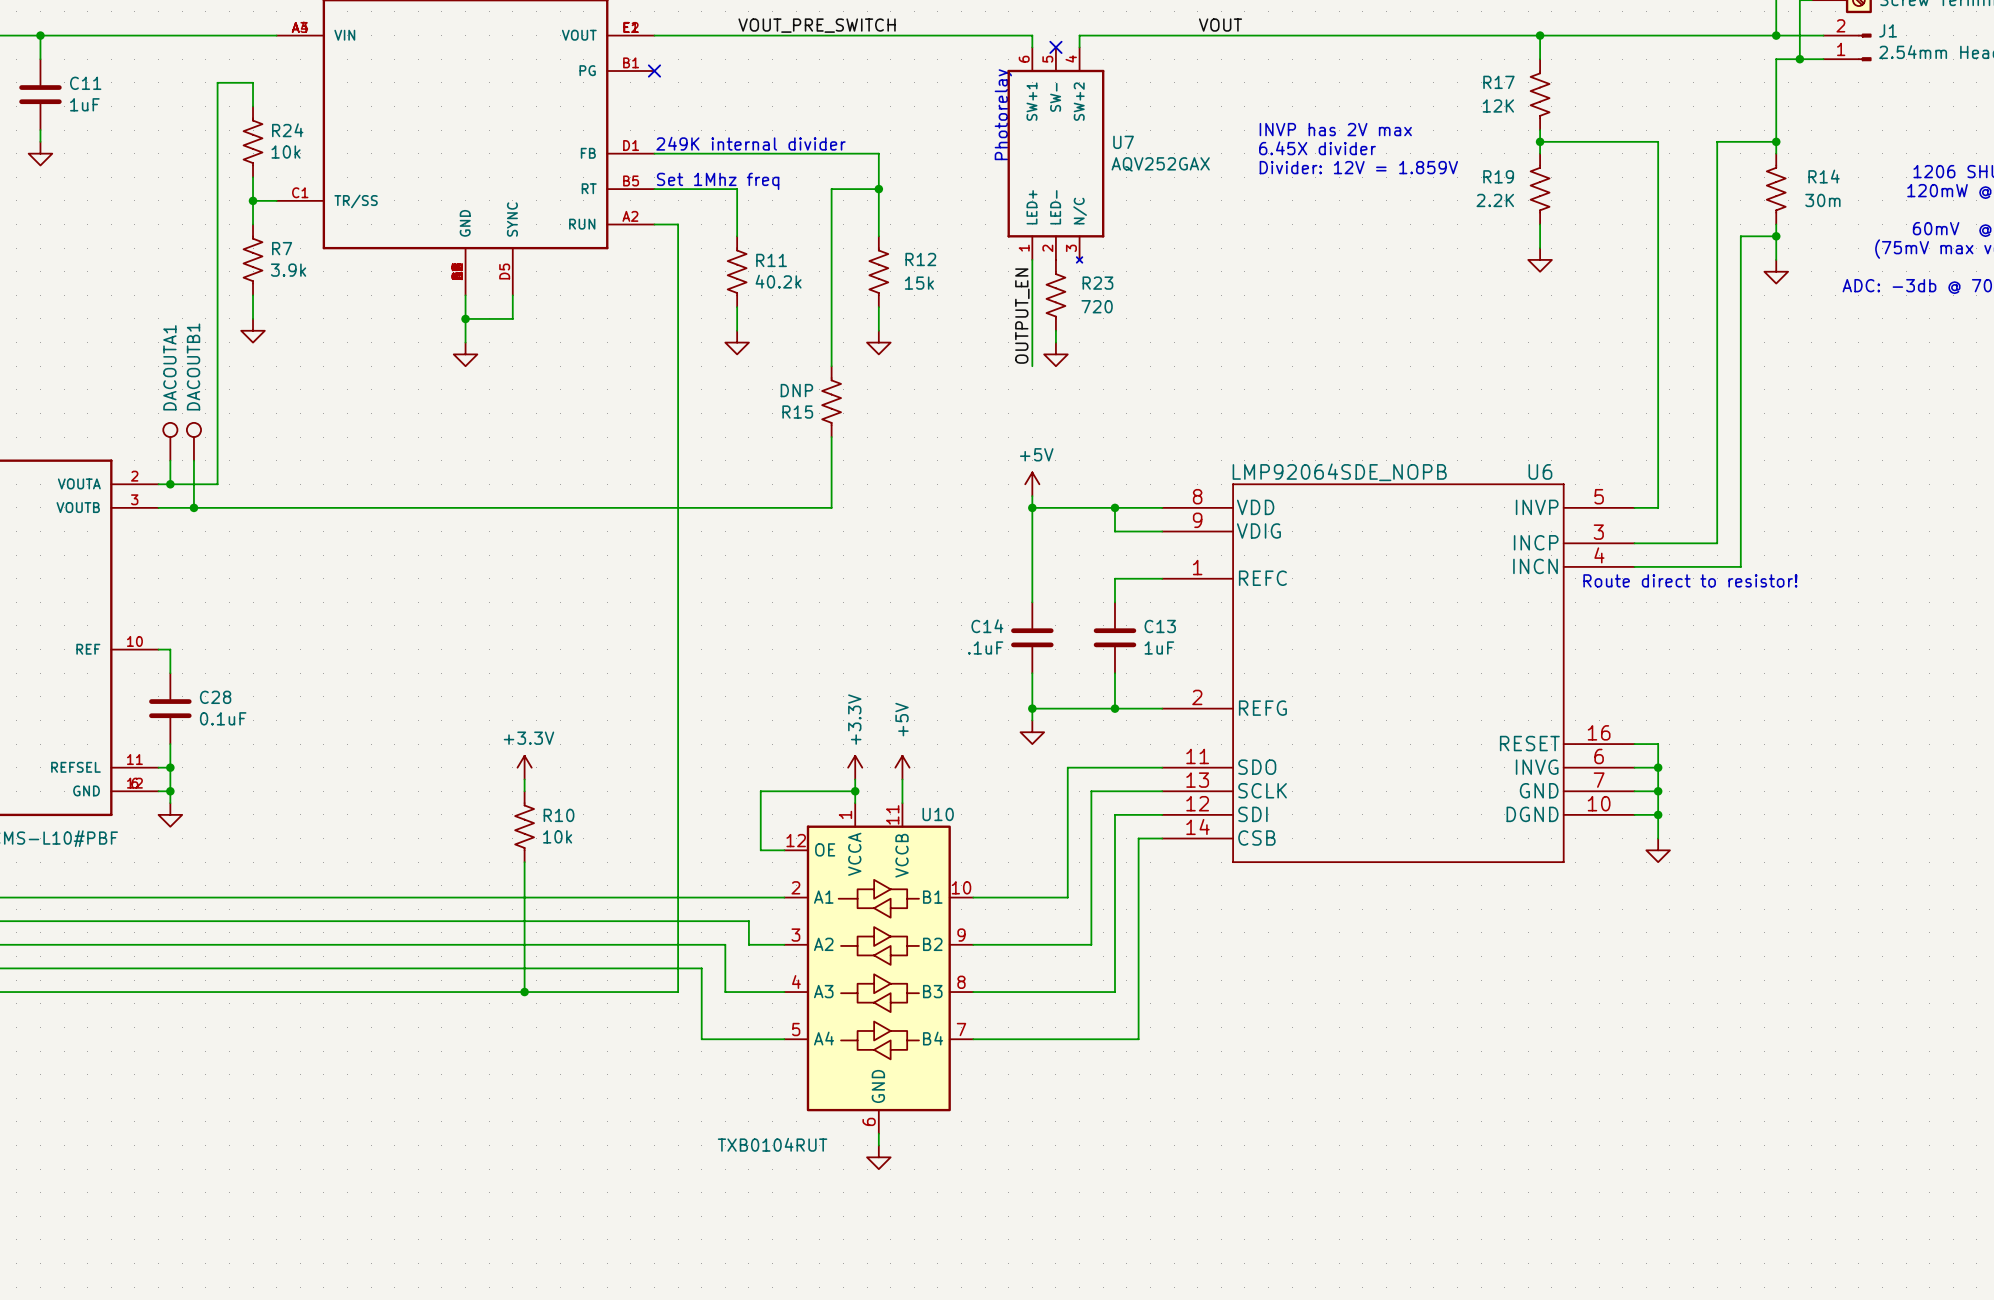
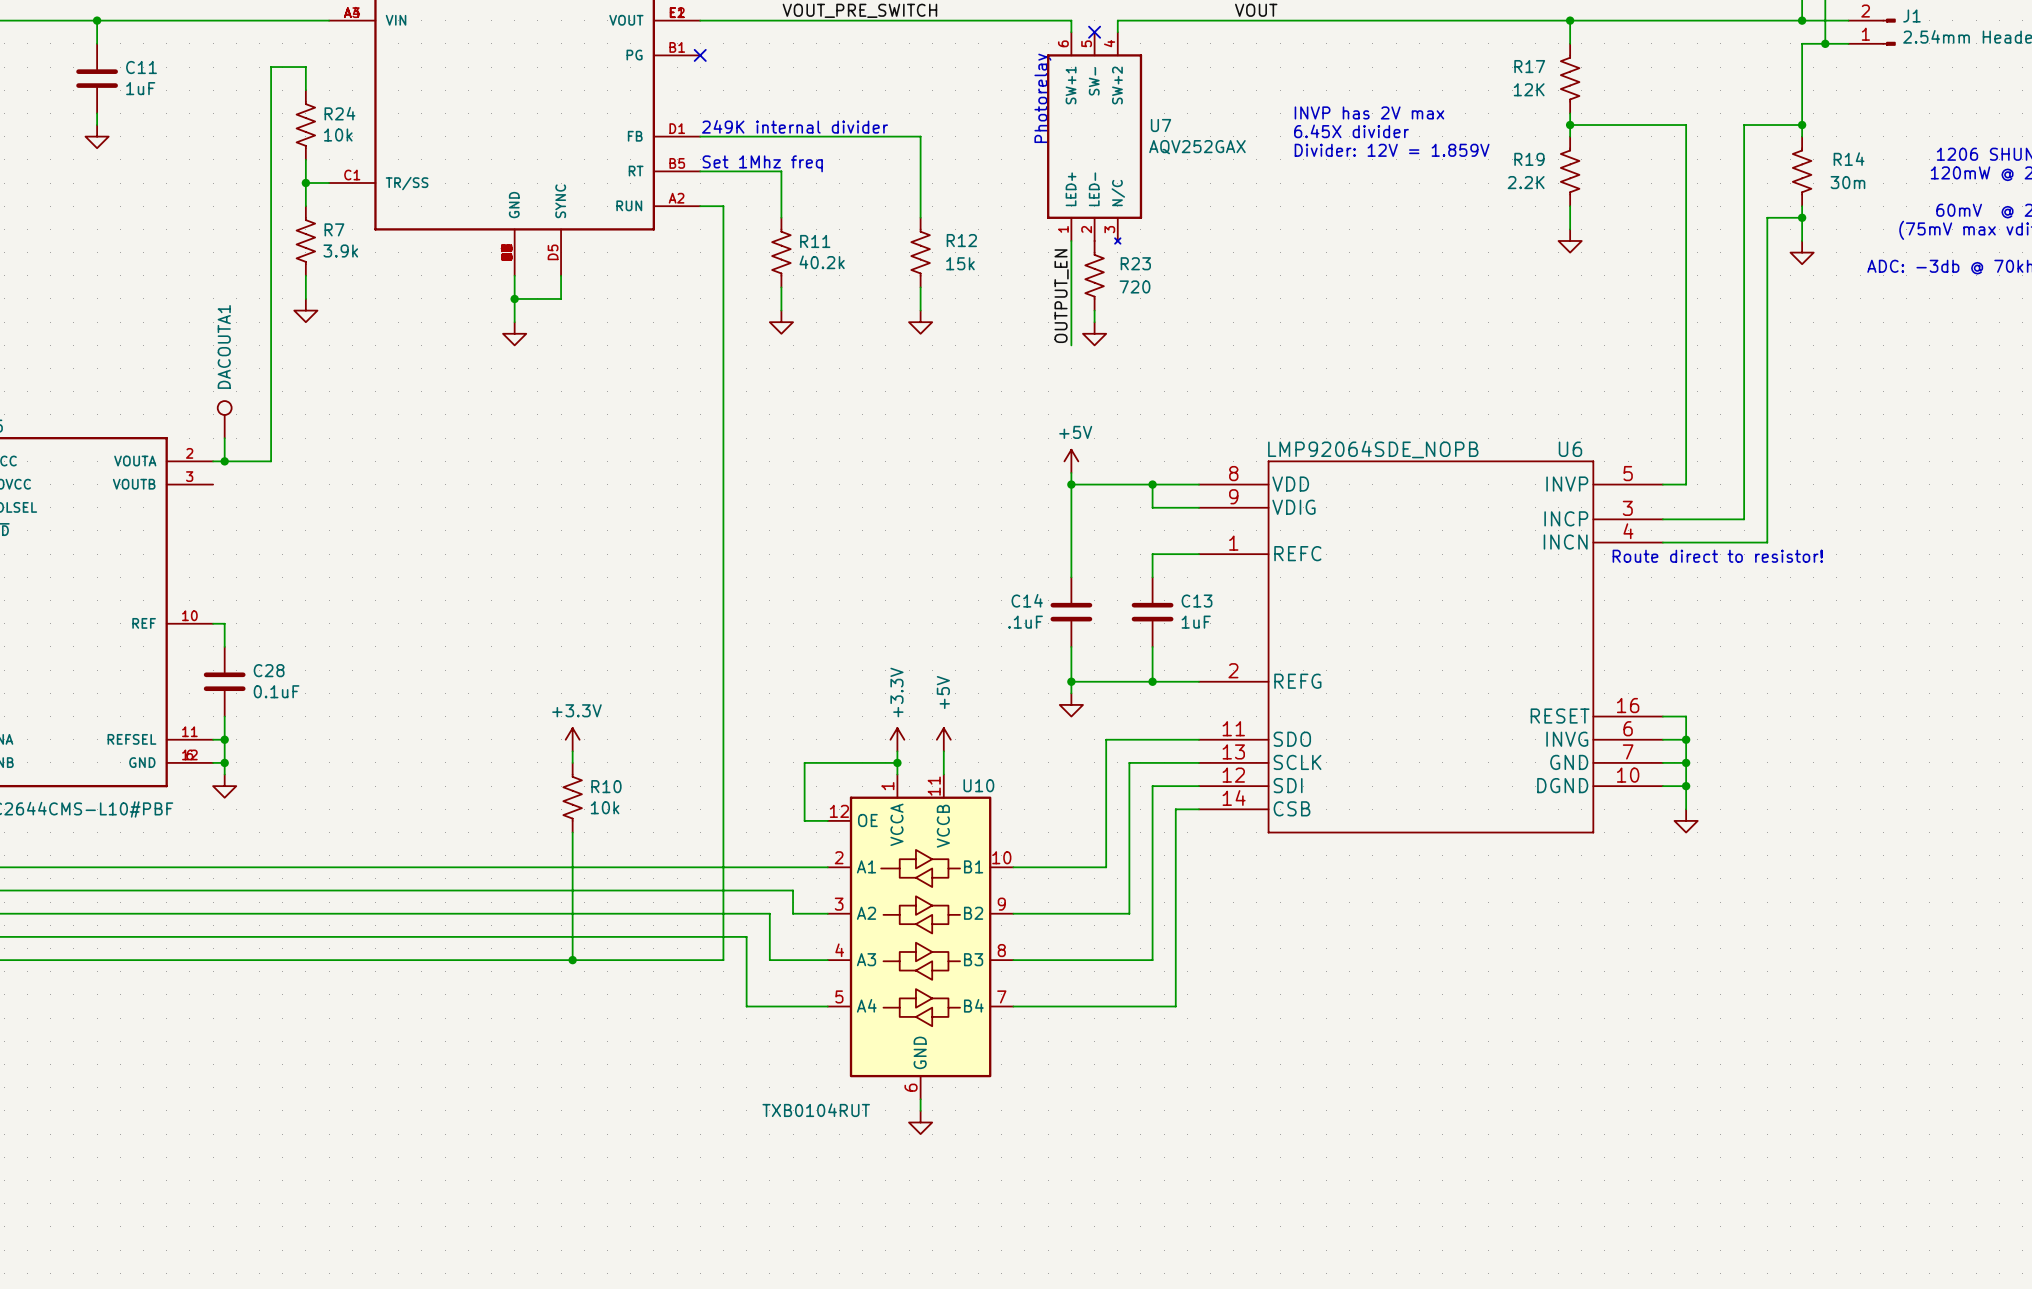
wire: (878, 189) (831, 189) (831, 366) -> none
junction: (878, 189) -> none
R15: DNP (831, 401) -> none
wire: (831, 437) (831, 507) (158, 507) -> none
DACOUTB1: (193, 441) -> none
wire: (193, 460) (193, 507) -> none
junction: (193, 507) -> none

